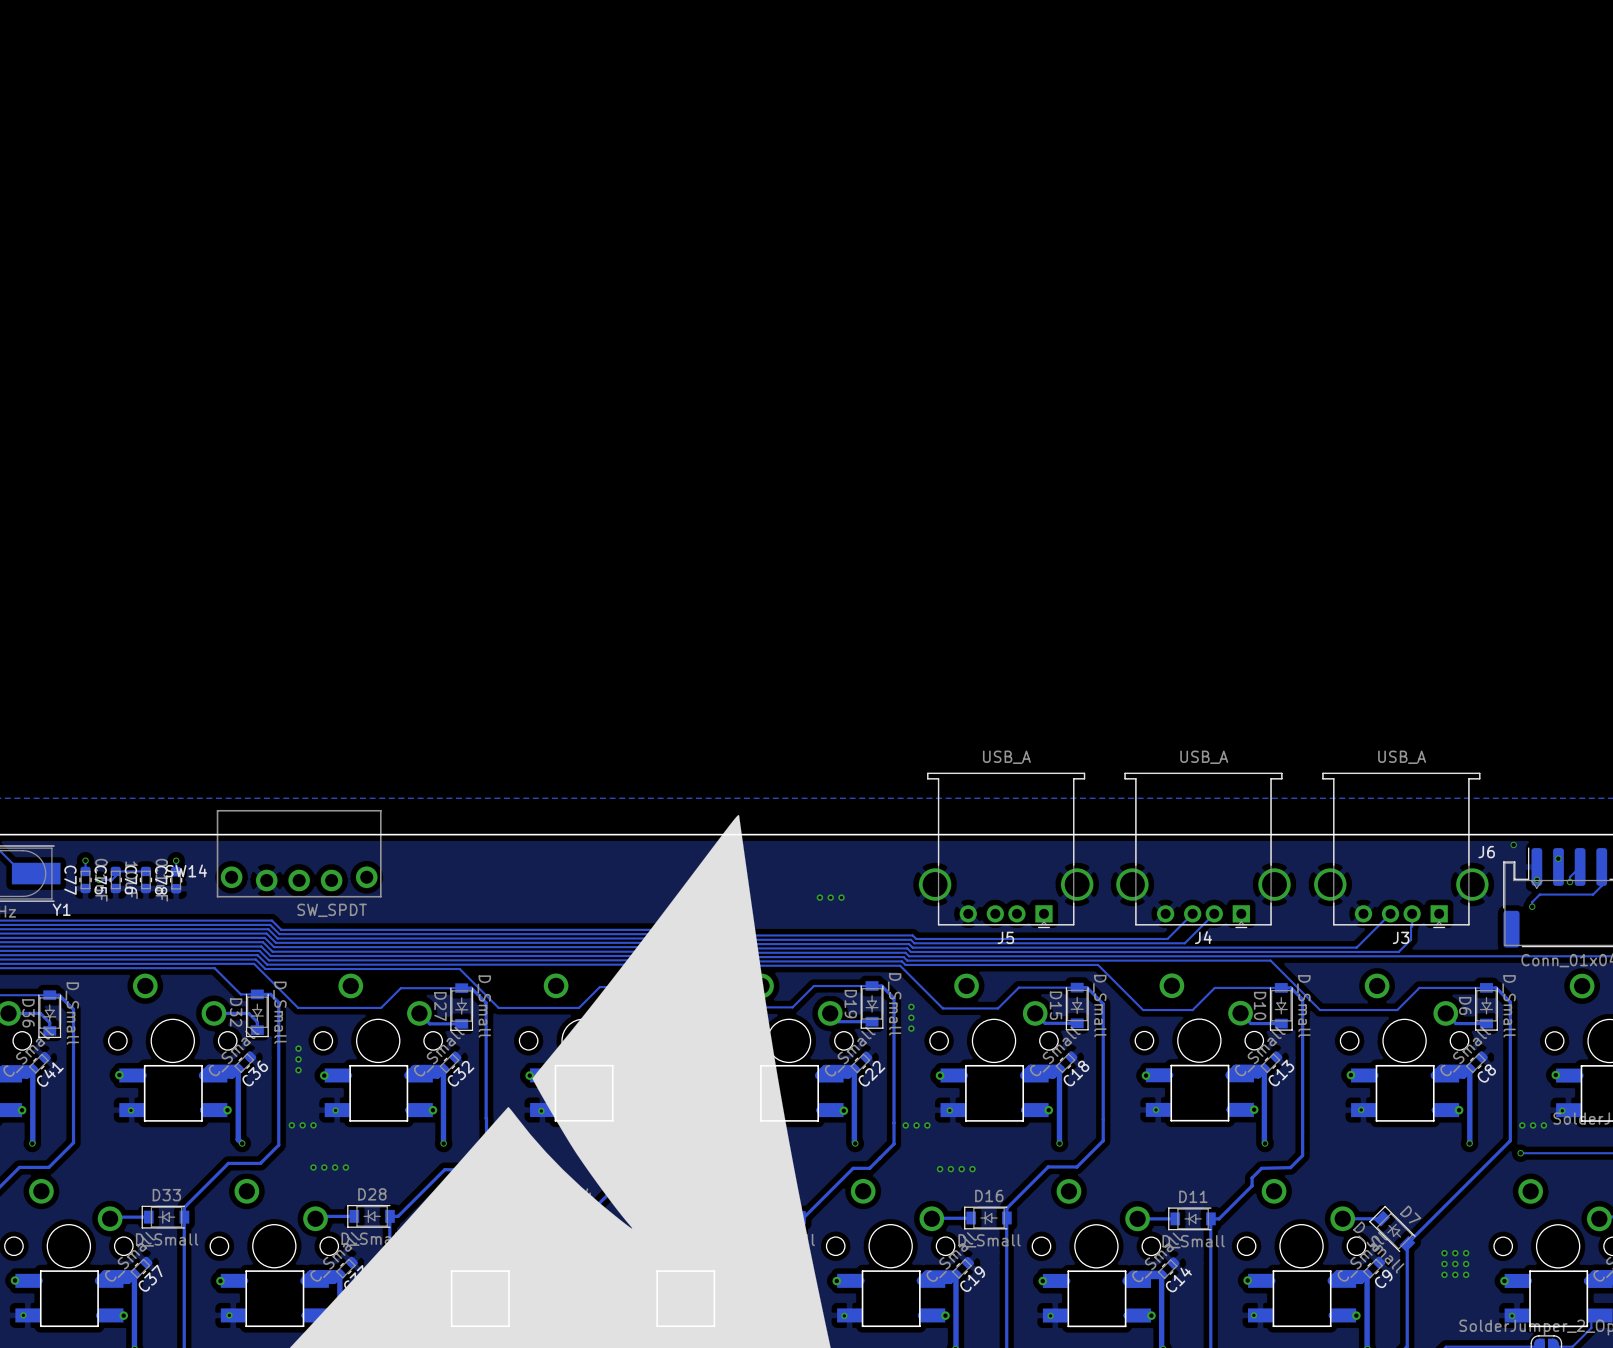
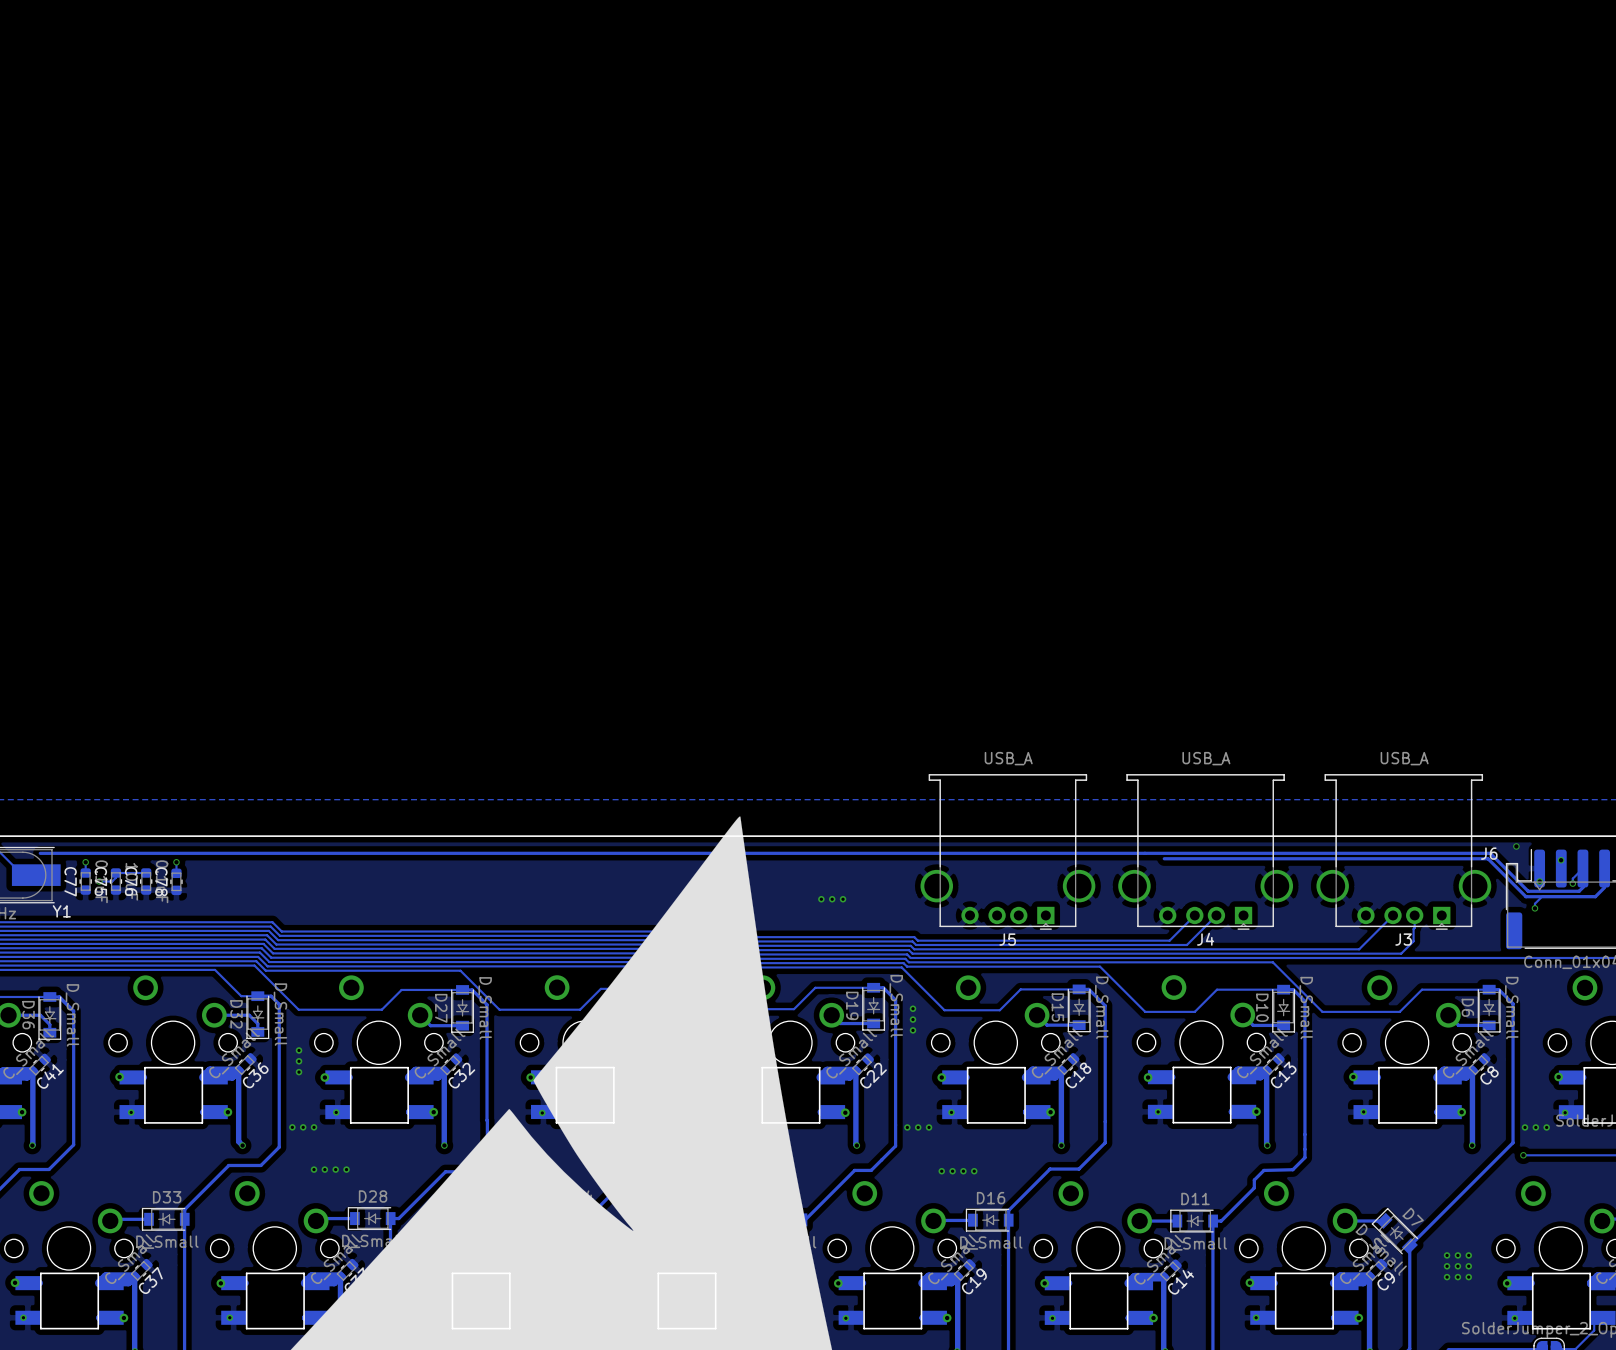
track: none -> (40, 853) (1490, 853) (1528, 891) (1579, 891) (1582, 887) (1582, 868)
SW14: SW_SPDT (299, 853) -> none
track: none -> (1164, 858) (1488, 858) (1525, 896) (1595, 896) (1604, 887)

